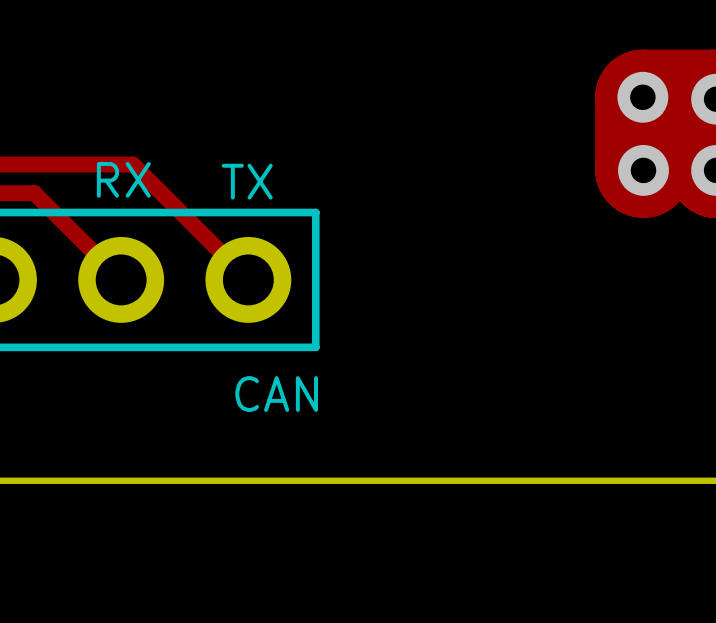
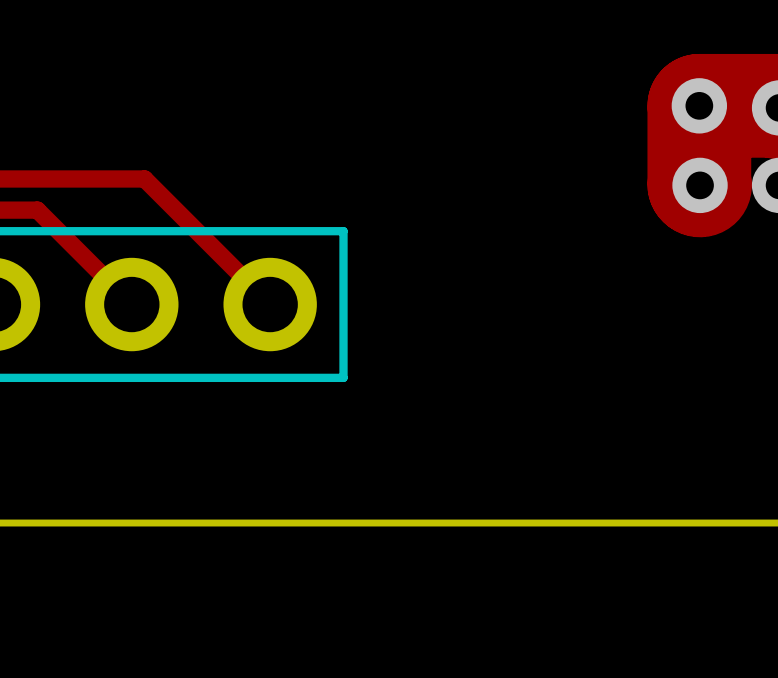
text: RX (123, 179) -> none
text: TX (247, 181) -> none
text: CAN (276, 394) -> none

